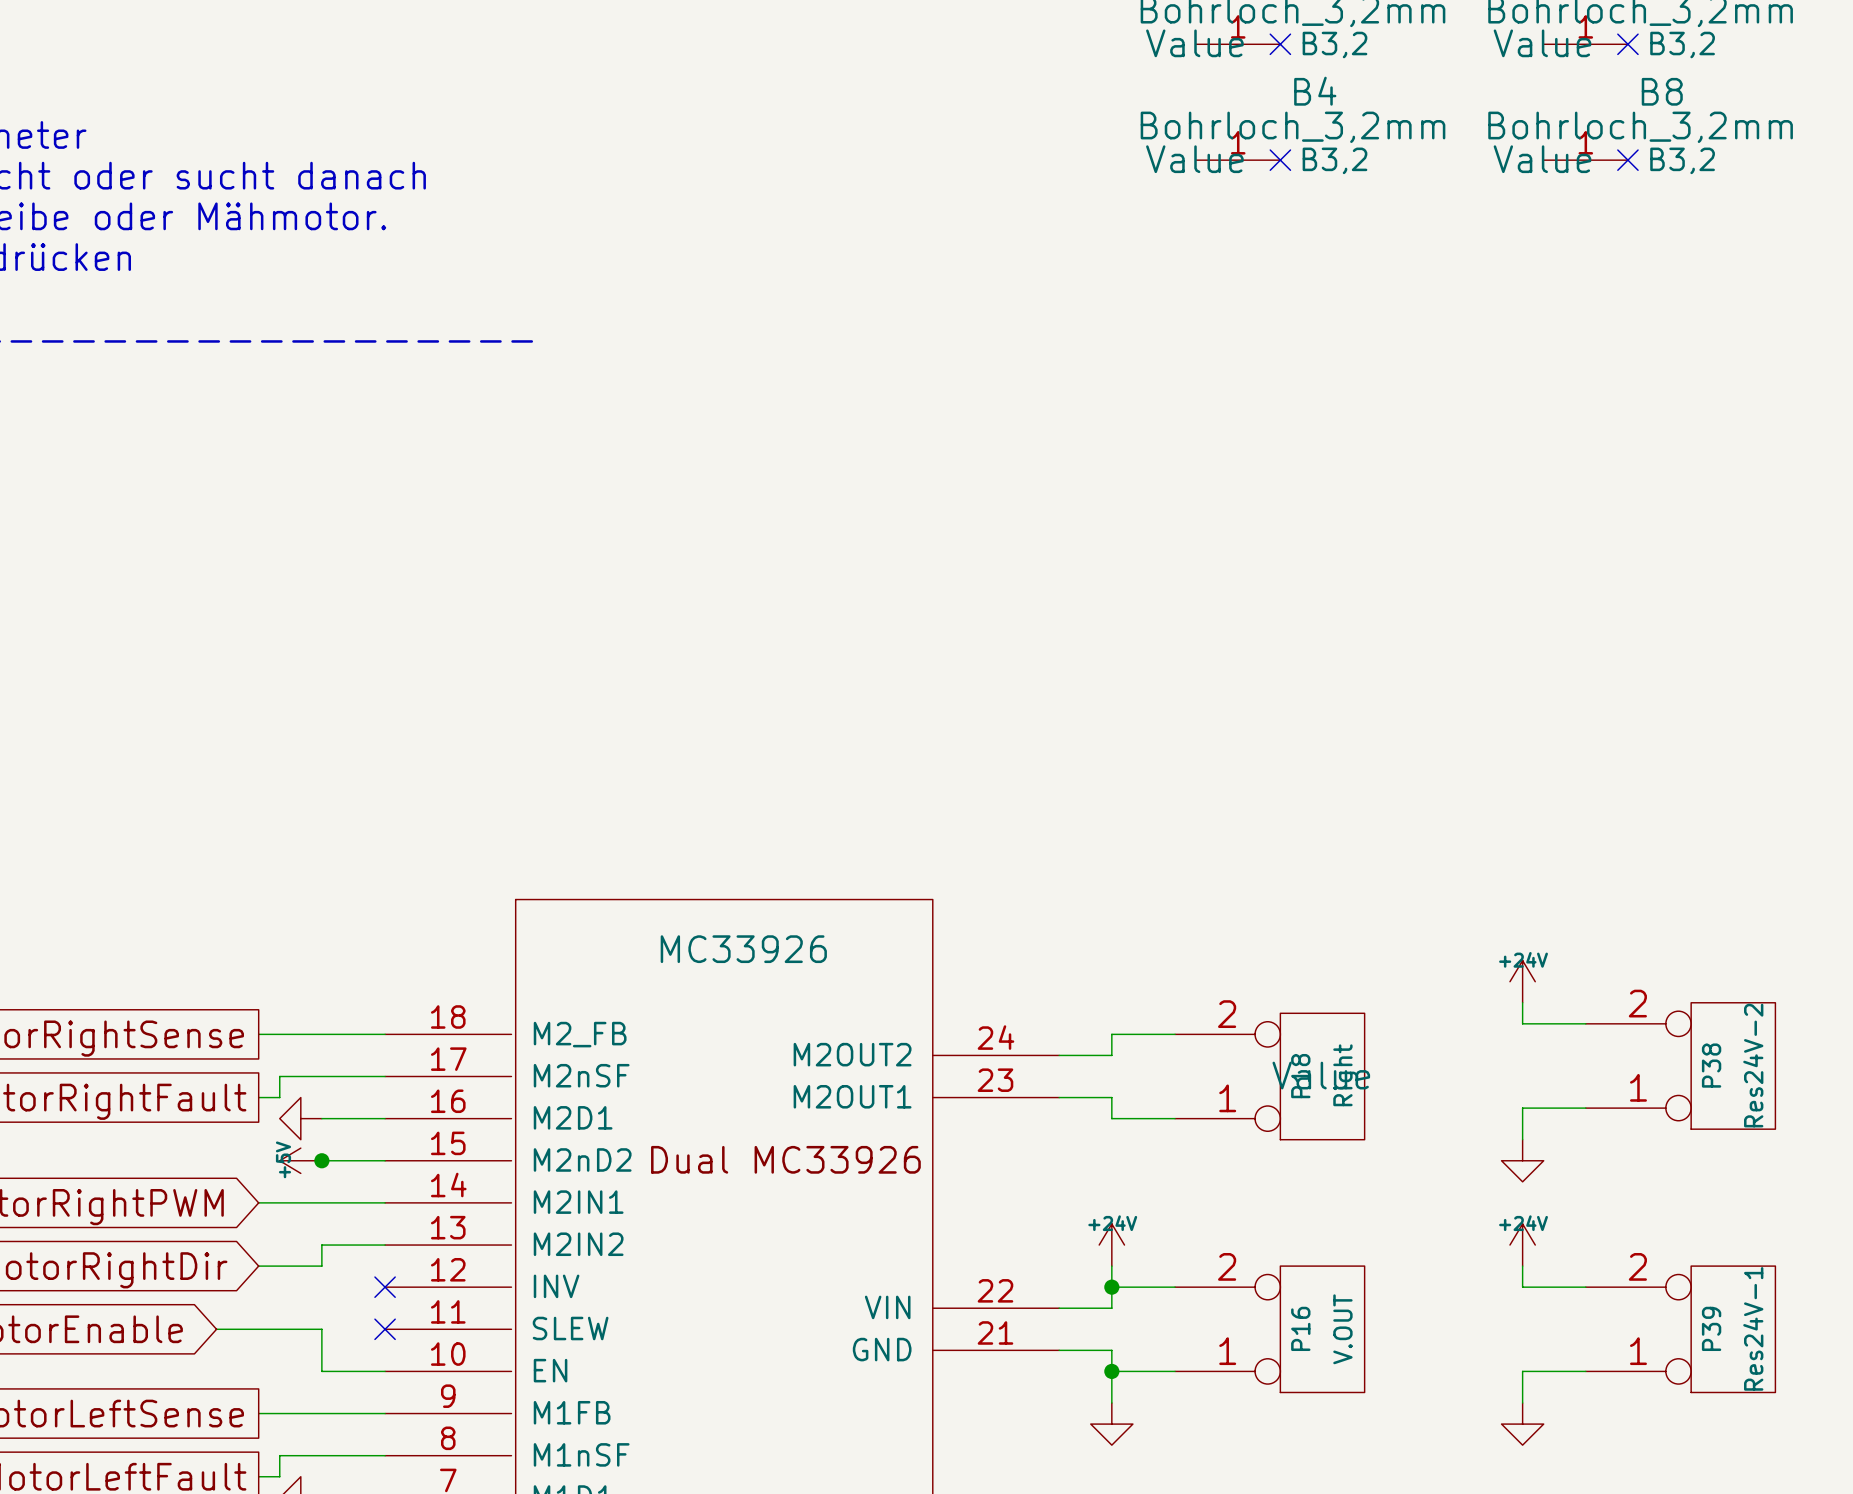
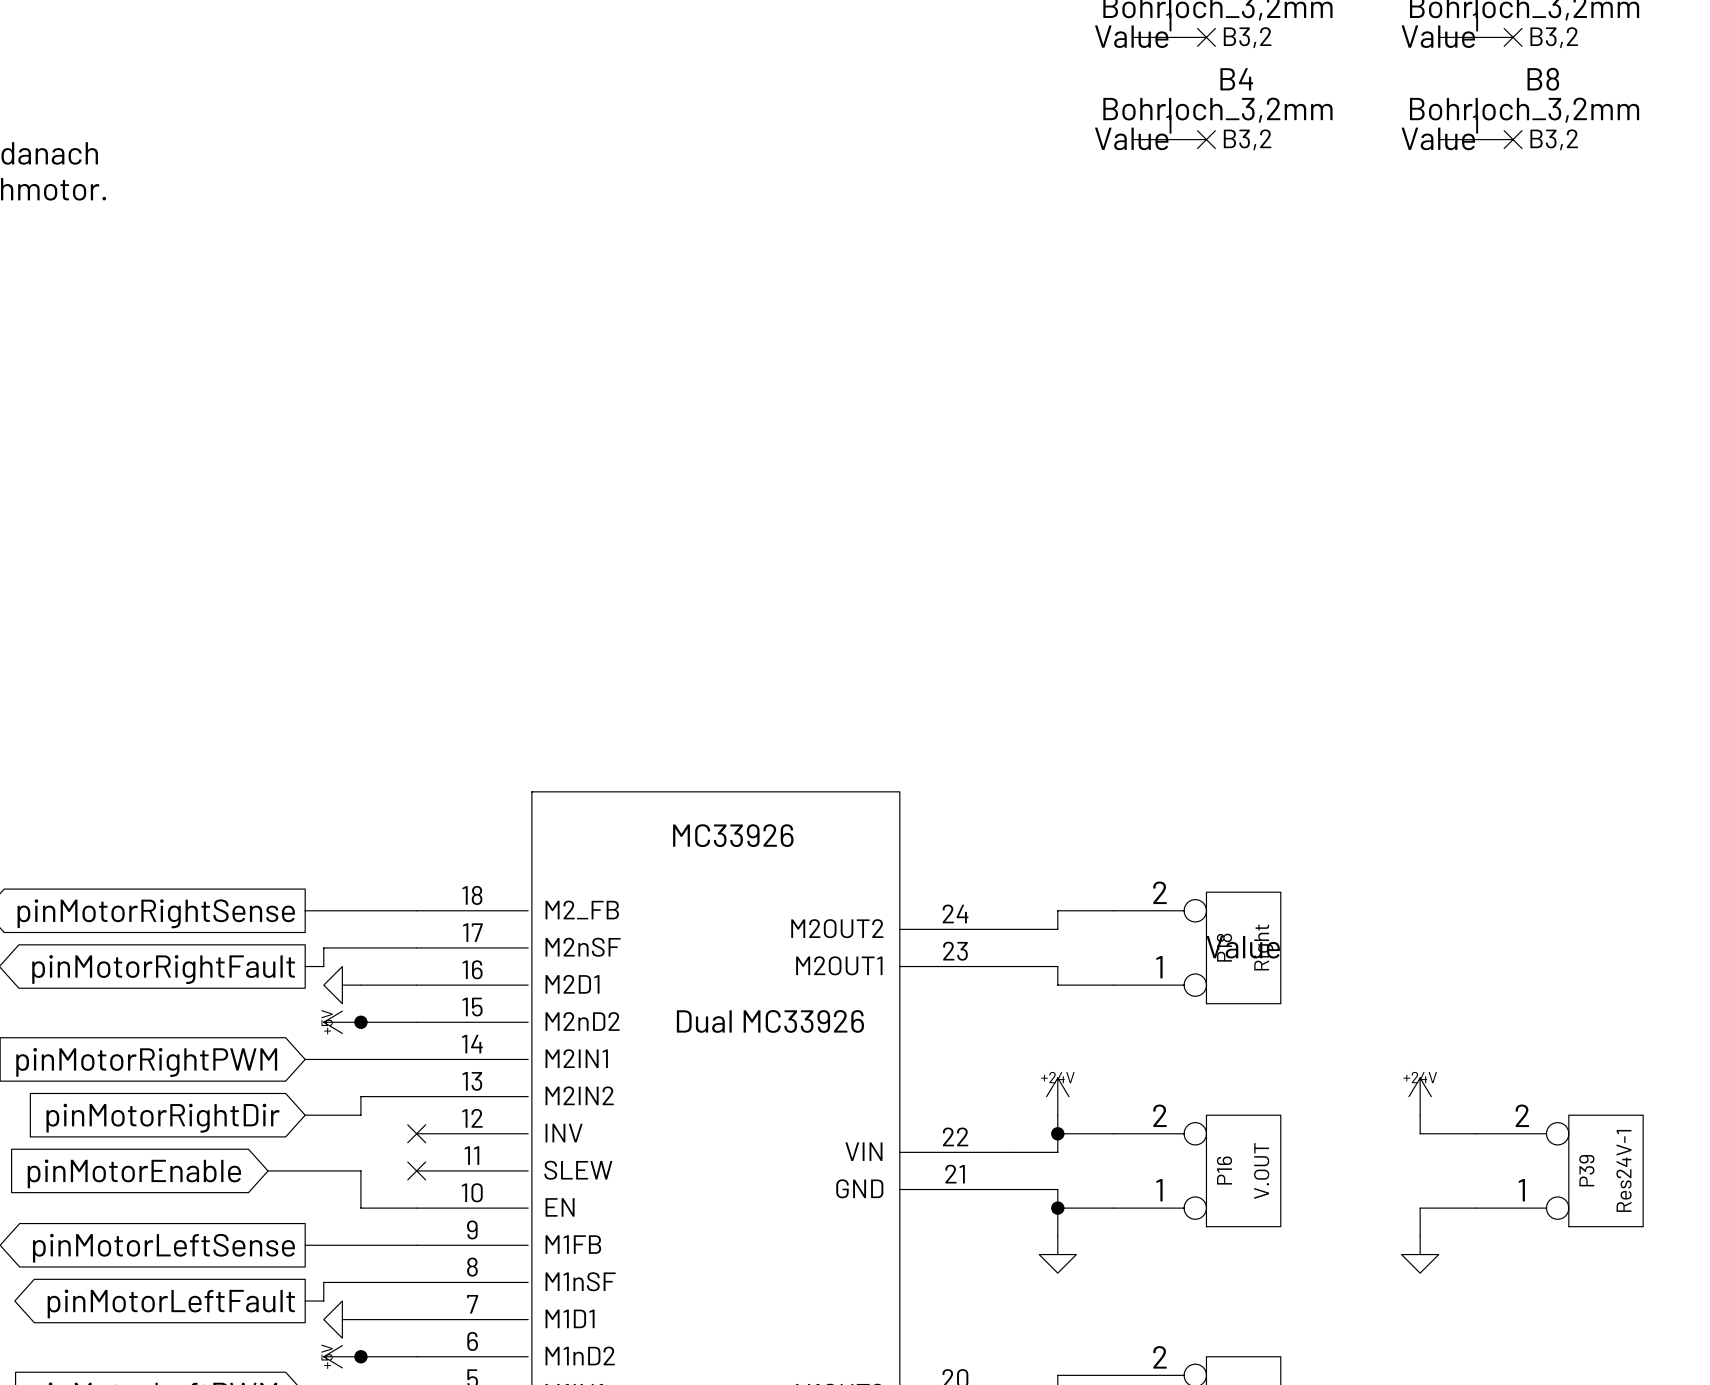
power symbol: +24V (1522, 981) -> none
wire: (1522, 1002) (1522, 1023) (1585, 1023) -> none
P38: Res24V-2 (1680, 1065) -> none
wire: (1585, 1108) (1522, 1108) (1522, 1139) -> none
power symbol: (1522, 1160) -> none

